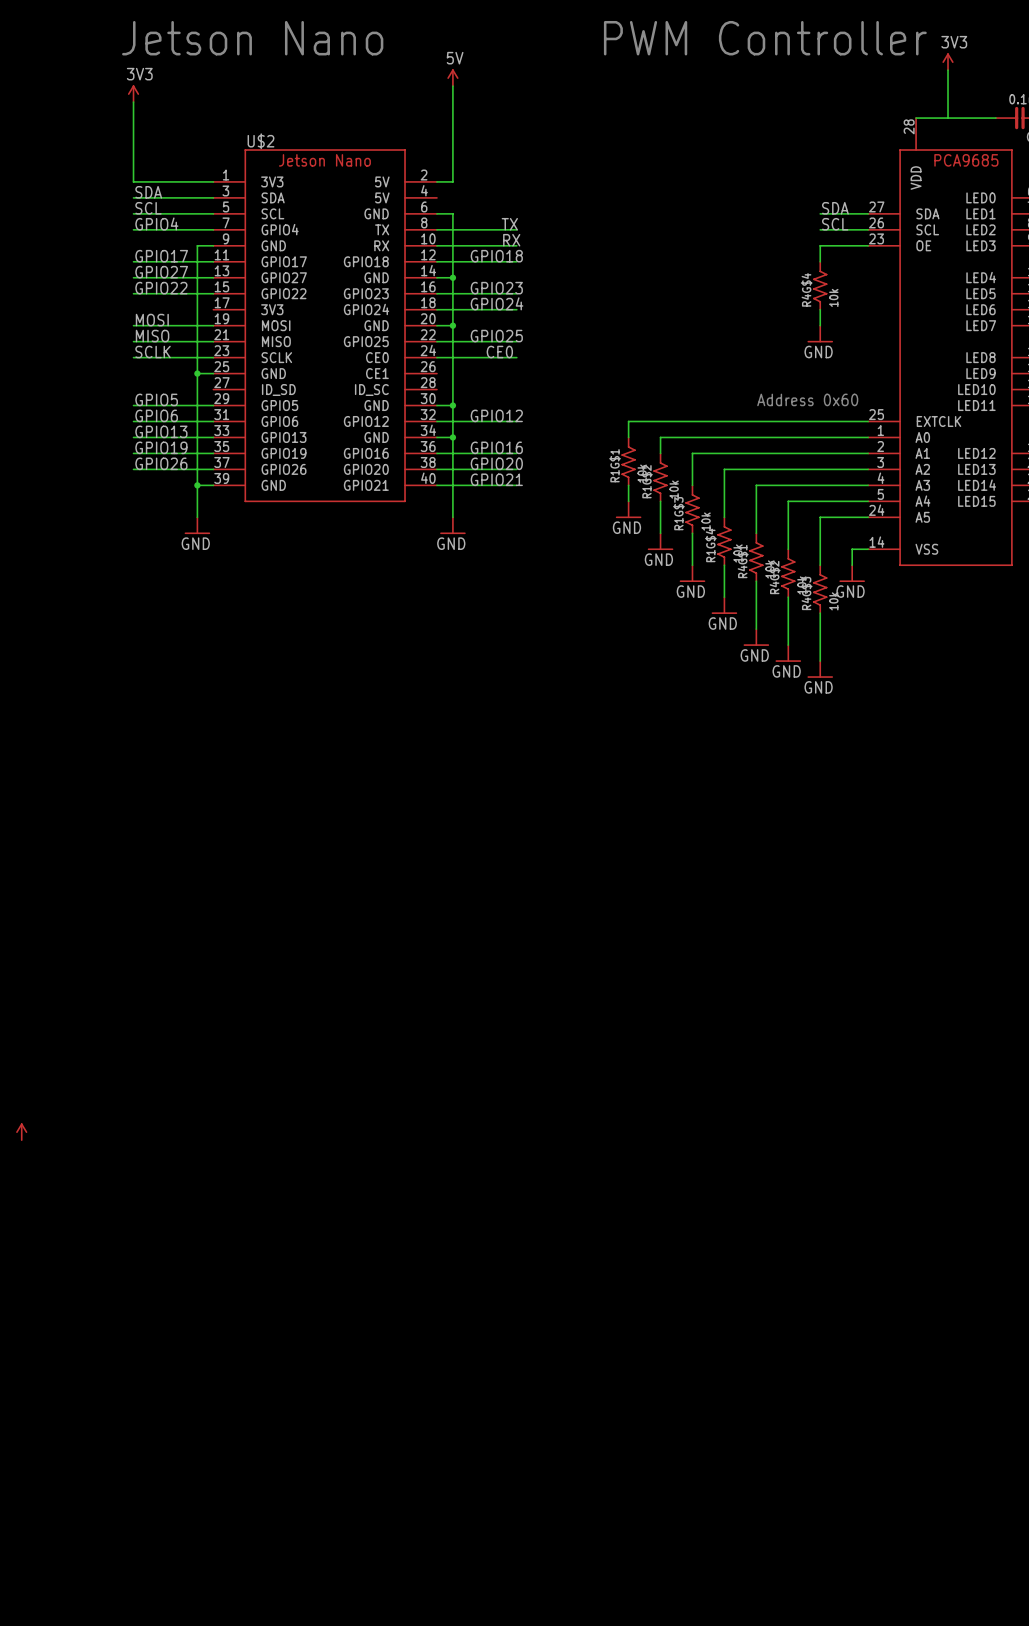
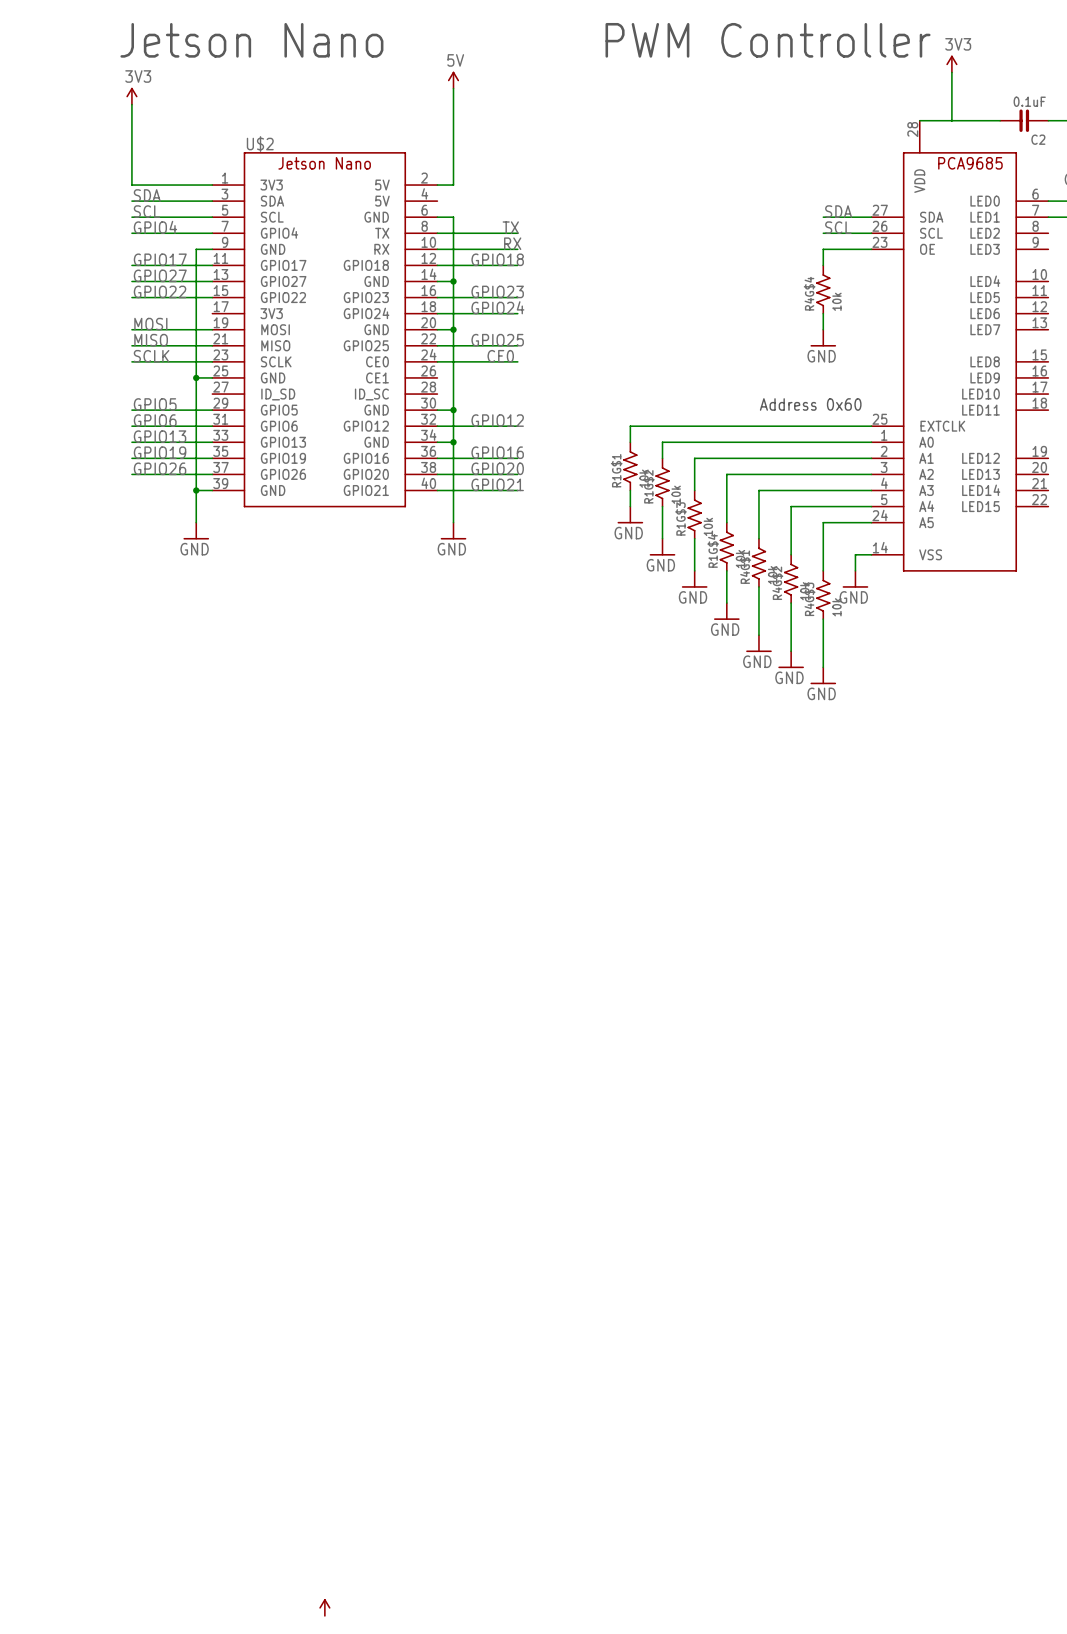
power symbol: (21, 1131) -> none
power symbol: none -> (324, 1607)

